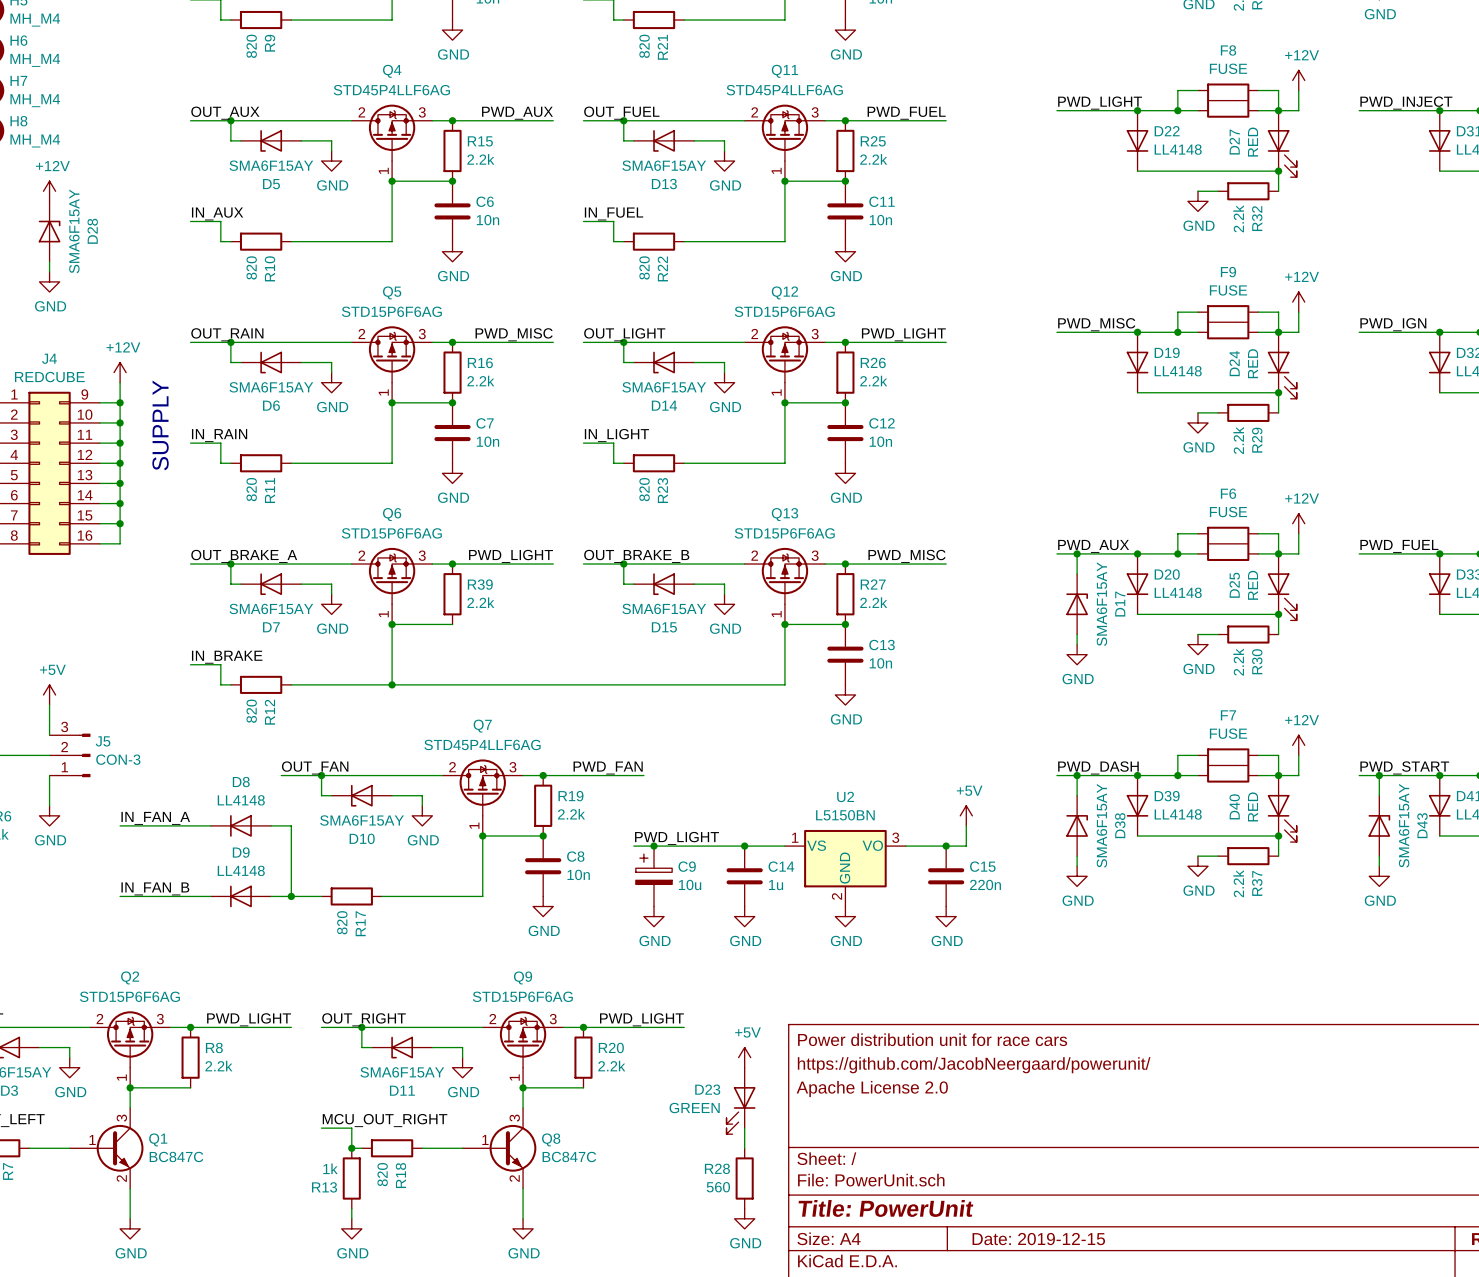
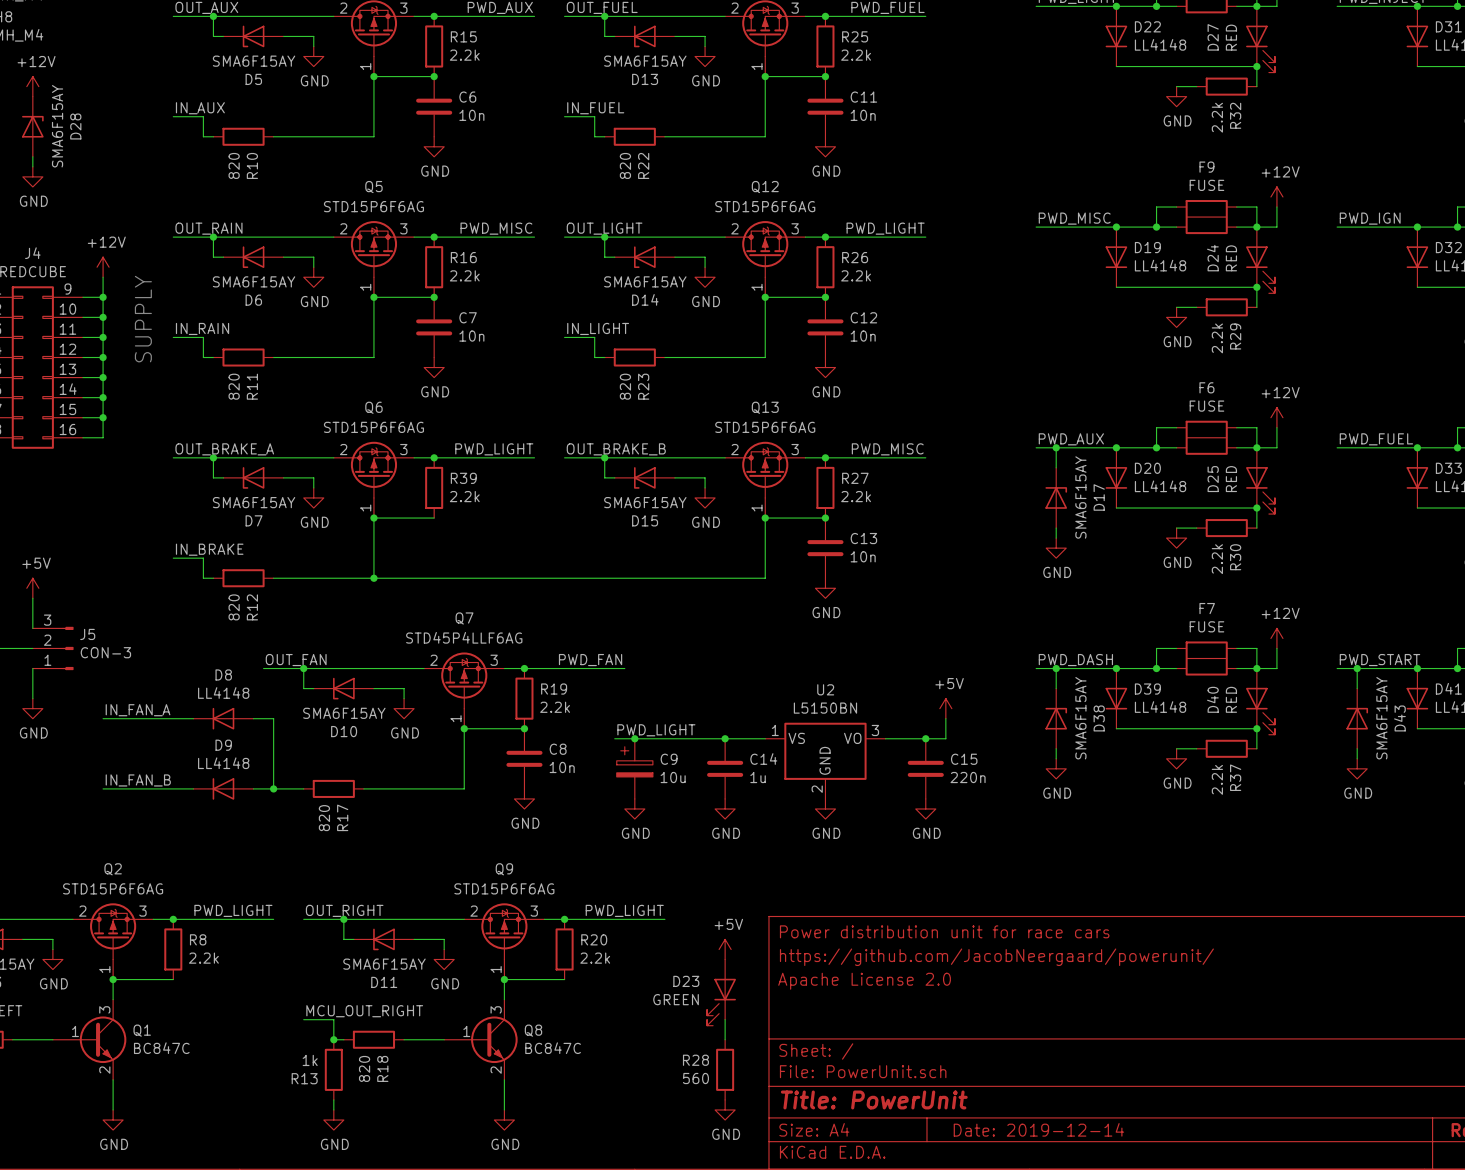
title block: Date: 2019-12-15 (1038, 1239) -> Date: 2019-12-14 (1038, 1129)

